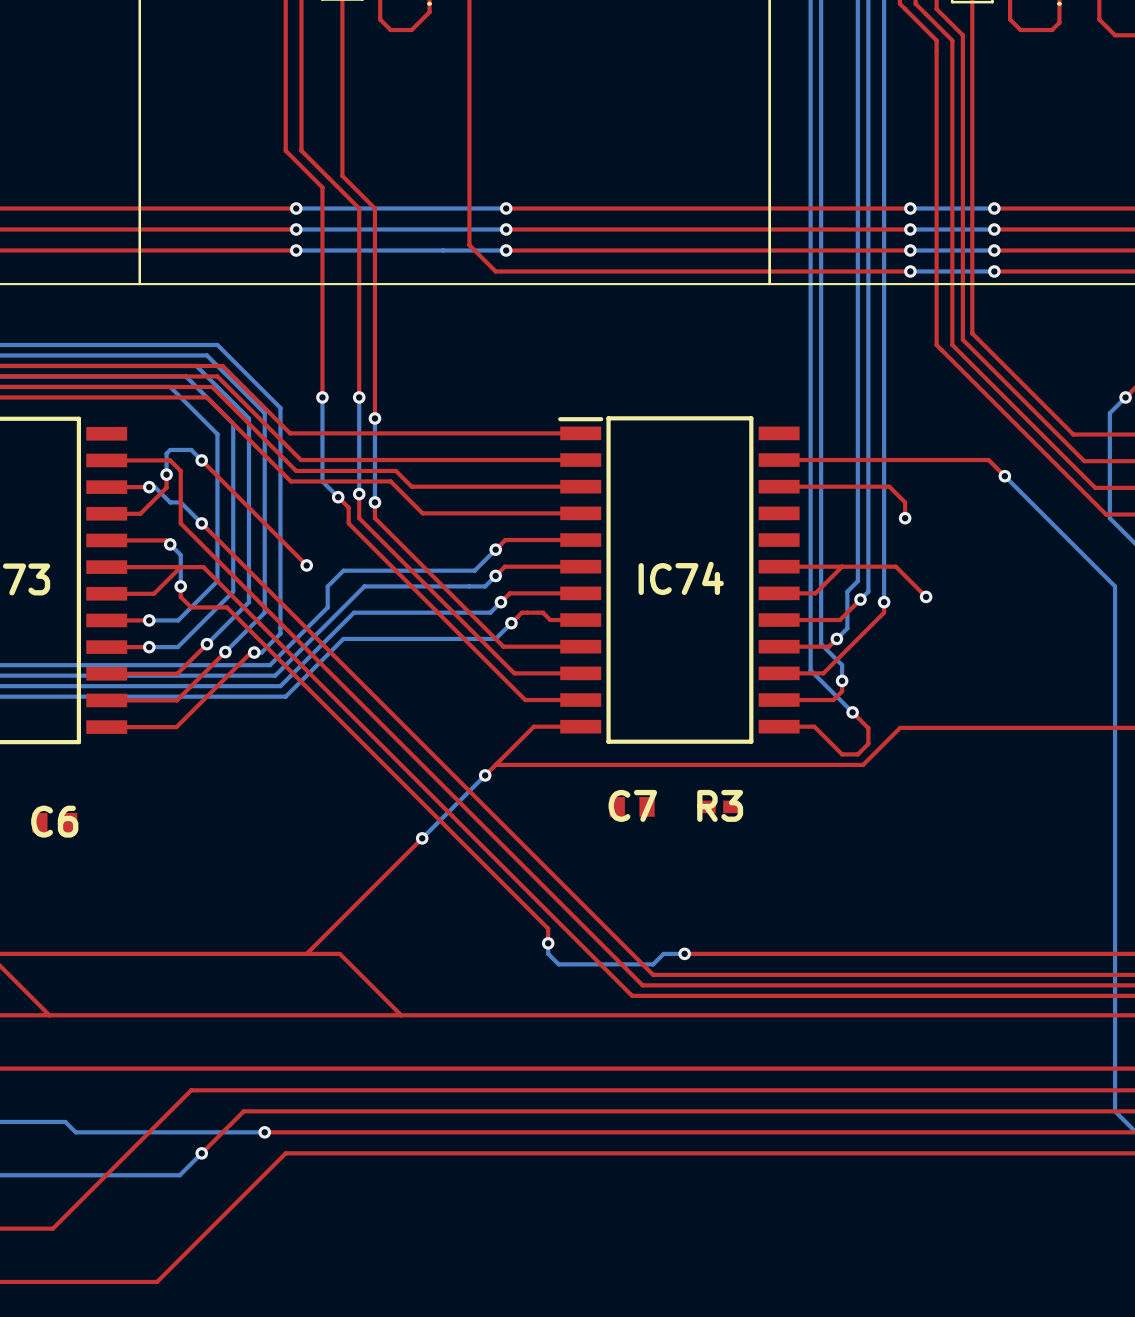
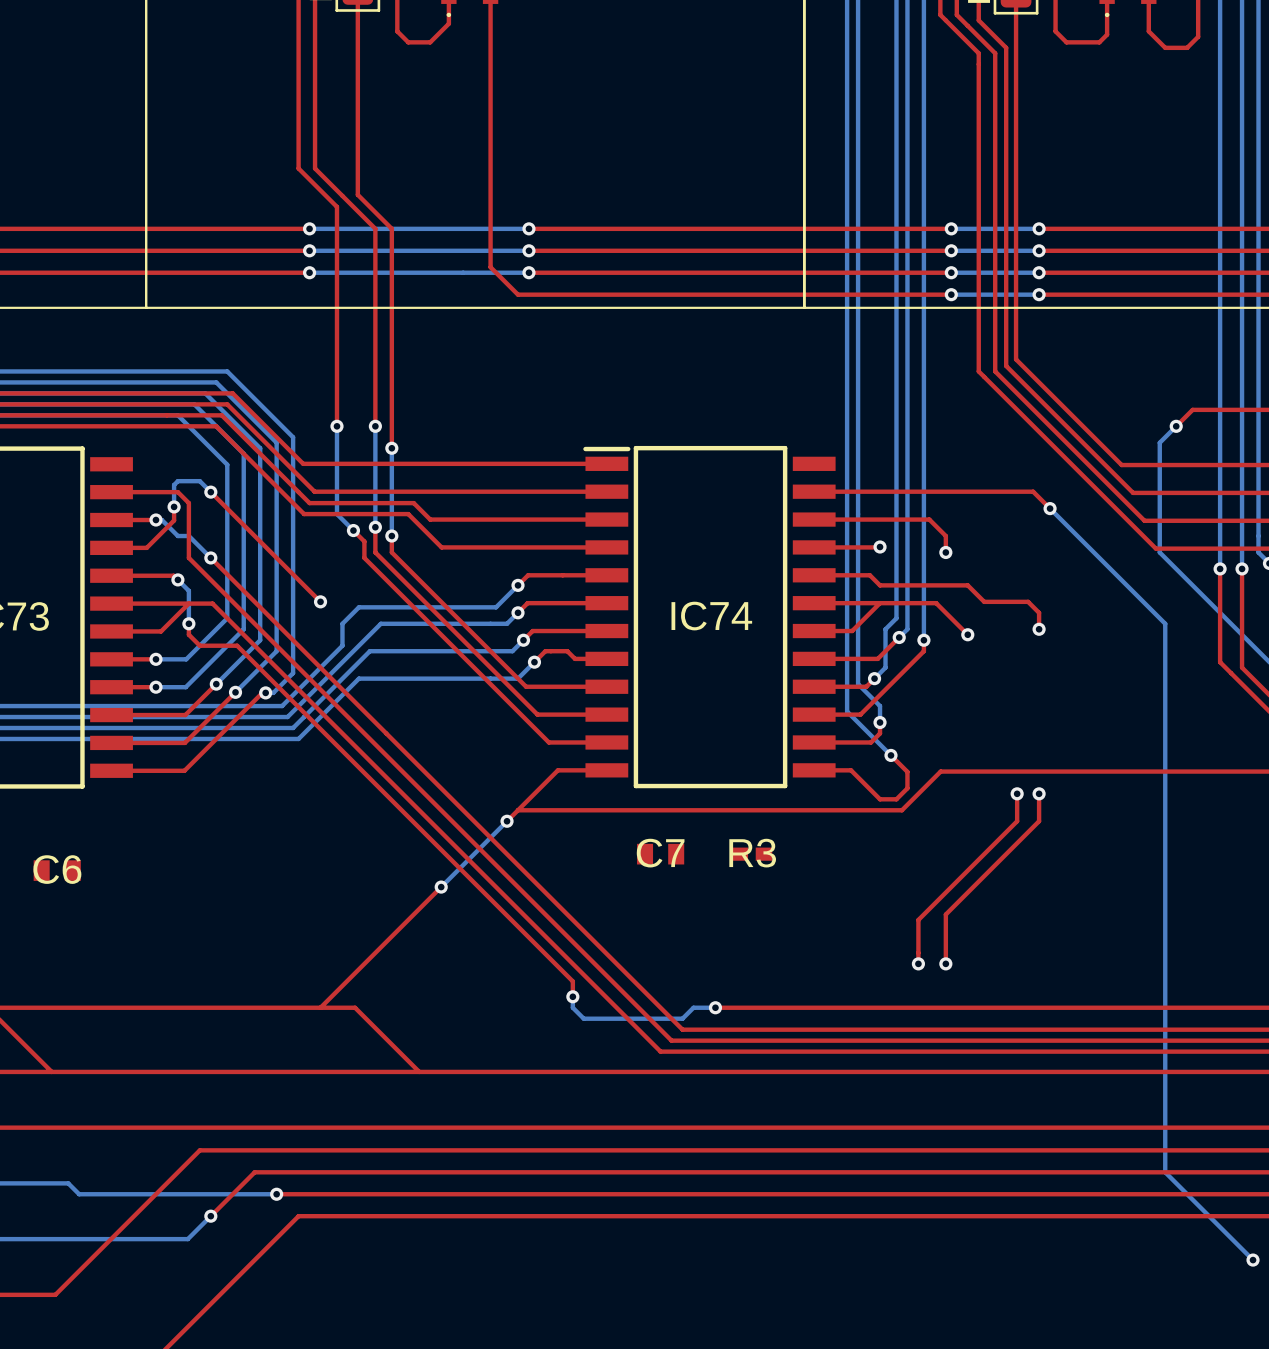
top track: none -> (880, 546) (814, 547)
via: none -> (880, 546)
top track: none -> (814, 575) (869, 575) (880, 585) (967, 585) (984, 601) (1028, 601) (1039, 612) (1039, 629)
via: none -> (1039, 629)
top track: none -> (1017, 793) (1017, 821) (918, 919) (918, 963)
via: none -> (1017, 793)
top track: none -> (1039, 793) (1039, 821) (945, 914) (945, 963)
via: none -> (1039, 793)
via: none -> (918, 963)
via: none -> (945, 963)

